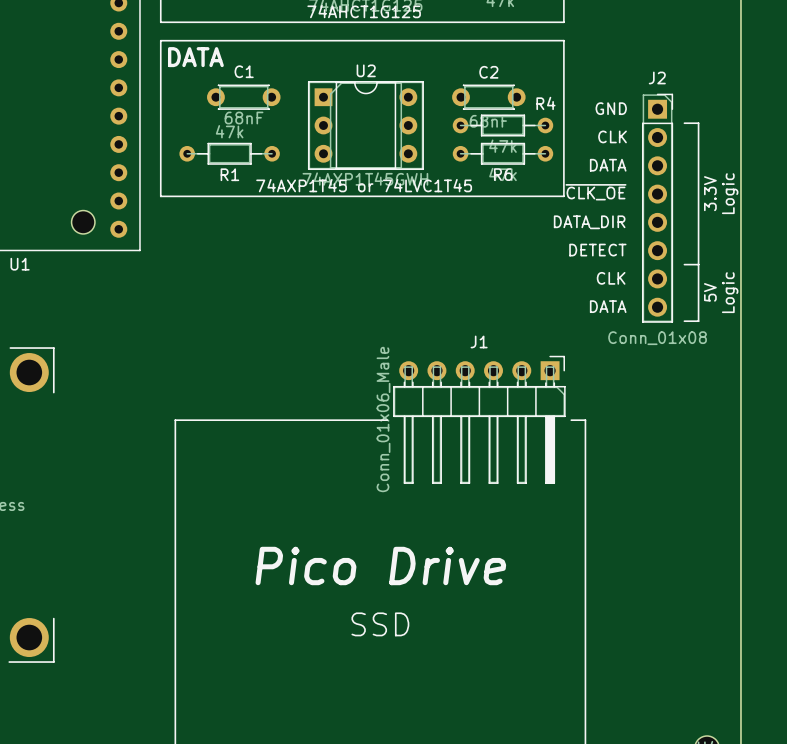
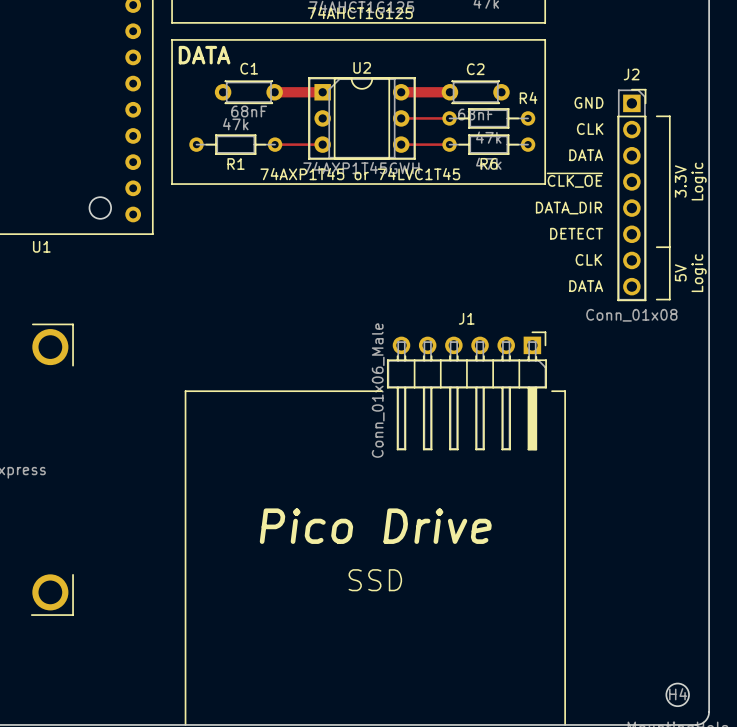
track: none -> (274, 92) (322, 92)
track: none -> (401, 92) (449, 92)
track: none -> (401, 118) (449, 118)
track: none -> (275, 144) (322, 144)
track: none -> (401, 144) (449, 144)

